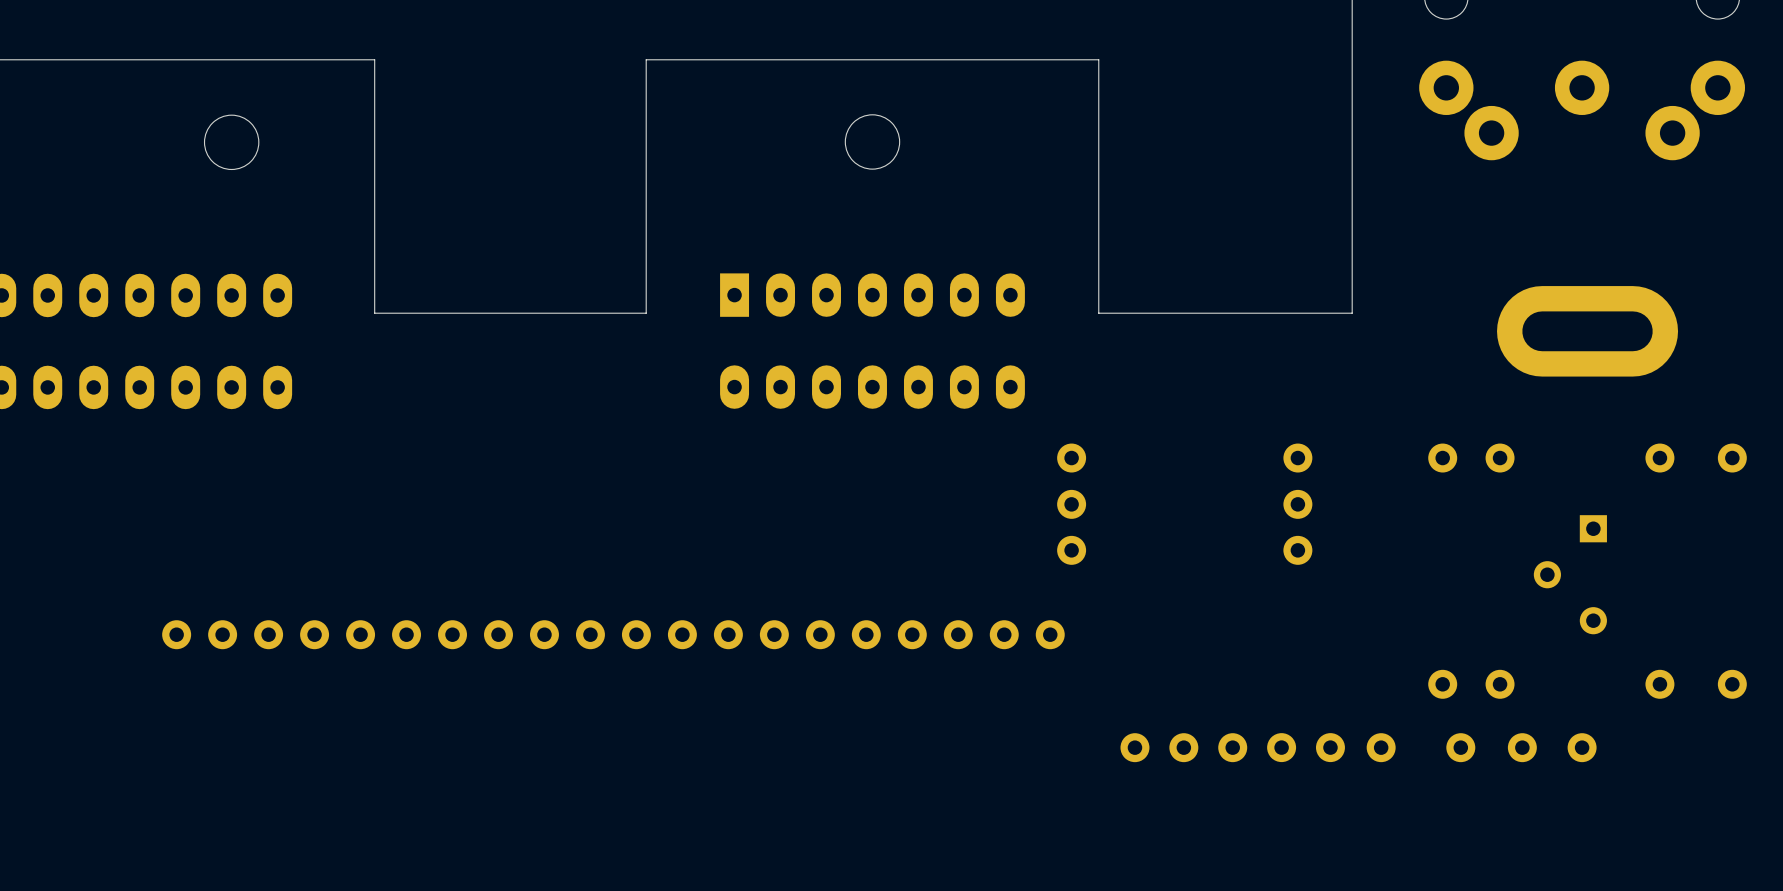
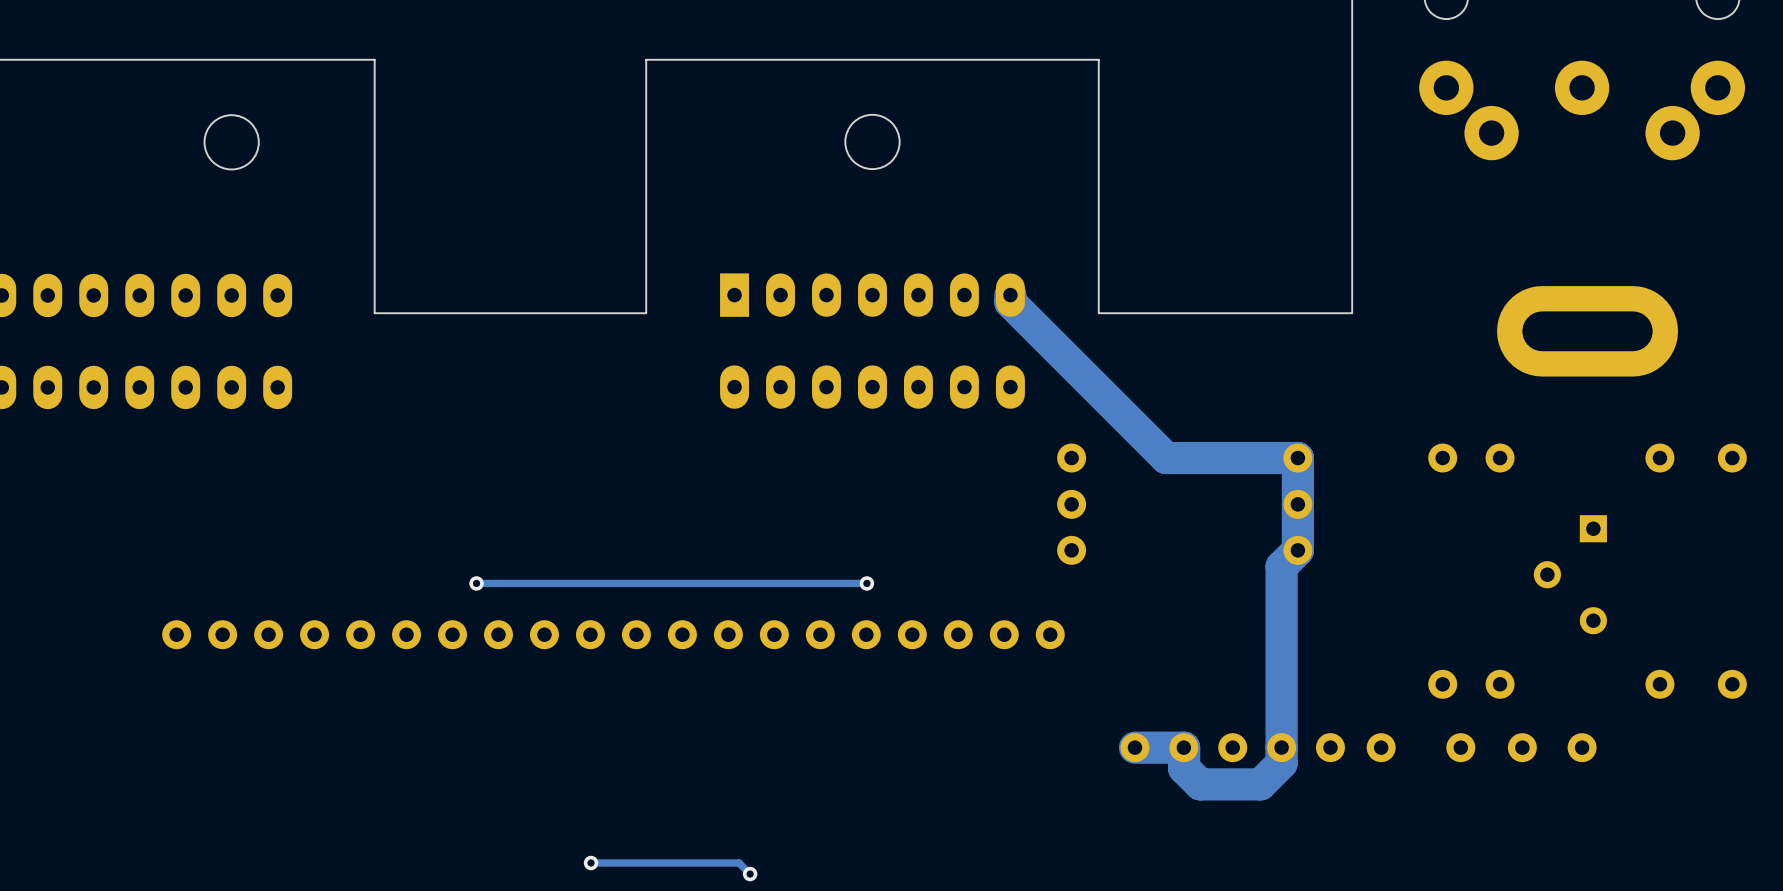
track: none -> (1010, 295) (1010, 302) (1166, 458) (1297, 458) (1297, 550) (1281, 566) (1281, 763) (1260, 784) (1200, 784) (1184, 768) (1183, 747) (1134, 747)
via: none -> (476, 583)
track: none -> (866, 583) (476, 583)
via: none -> (866, 583)
track: none -> (591, 863) (739, 863) (750, 874)
via: none -> (591, 863)
via: none -> (750, 874)

